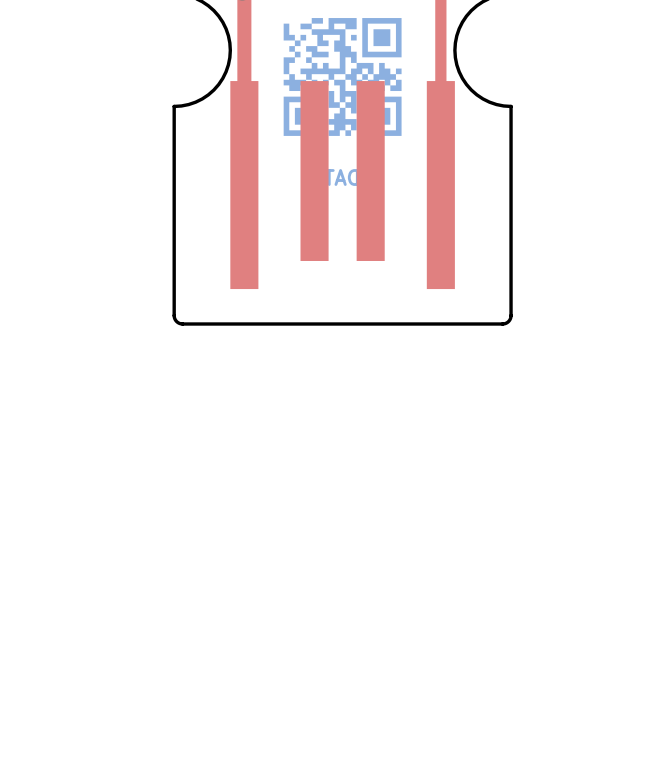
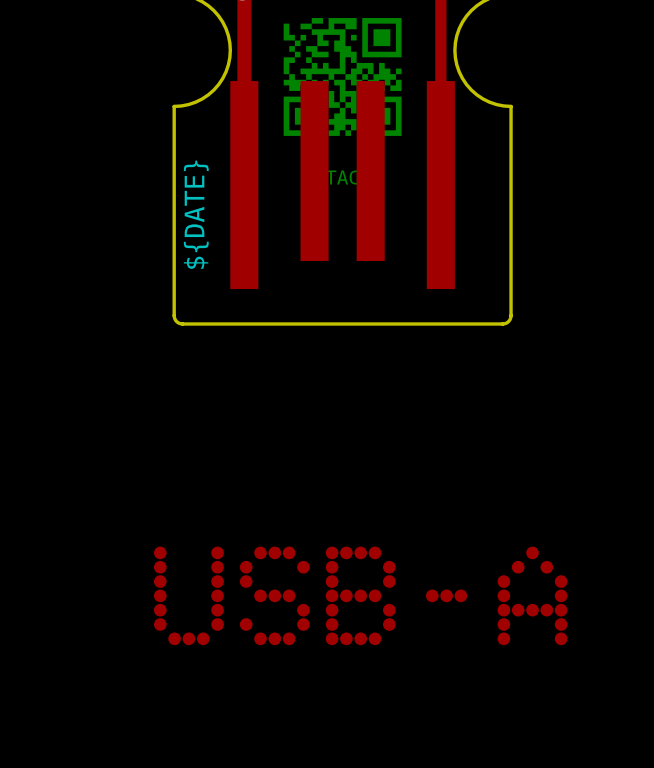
text: none -> ${DATE} (196, 214)
part: none -> (360, 595)

